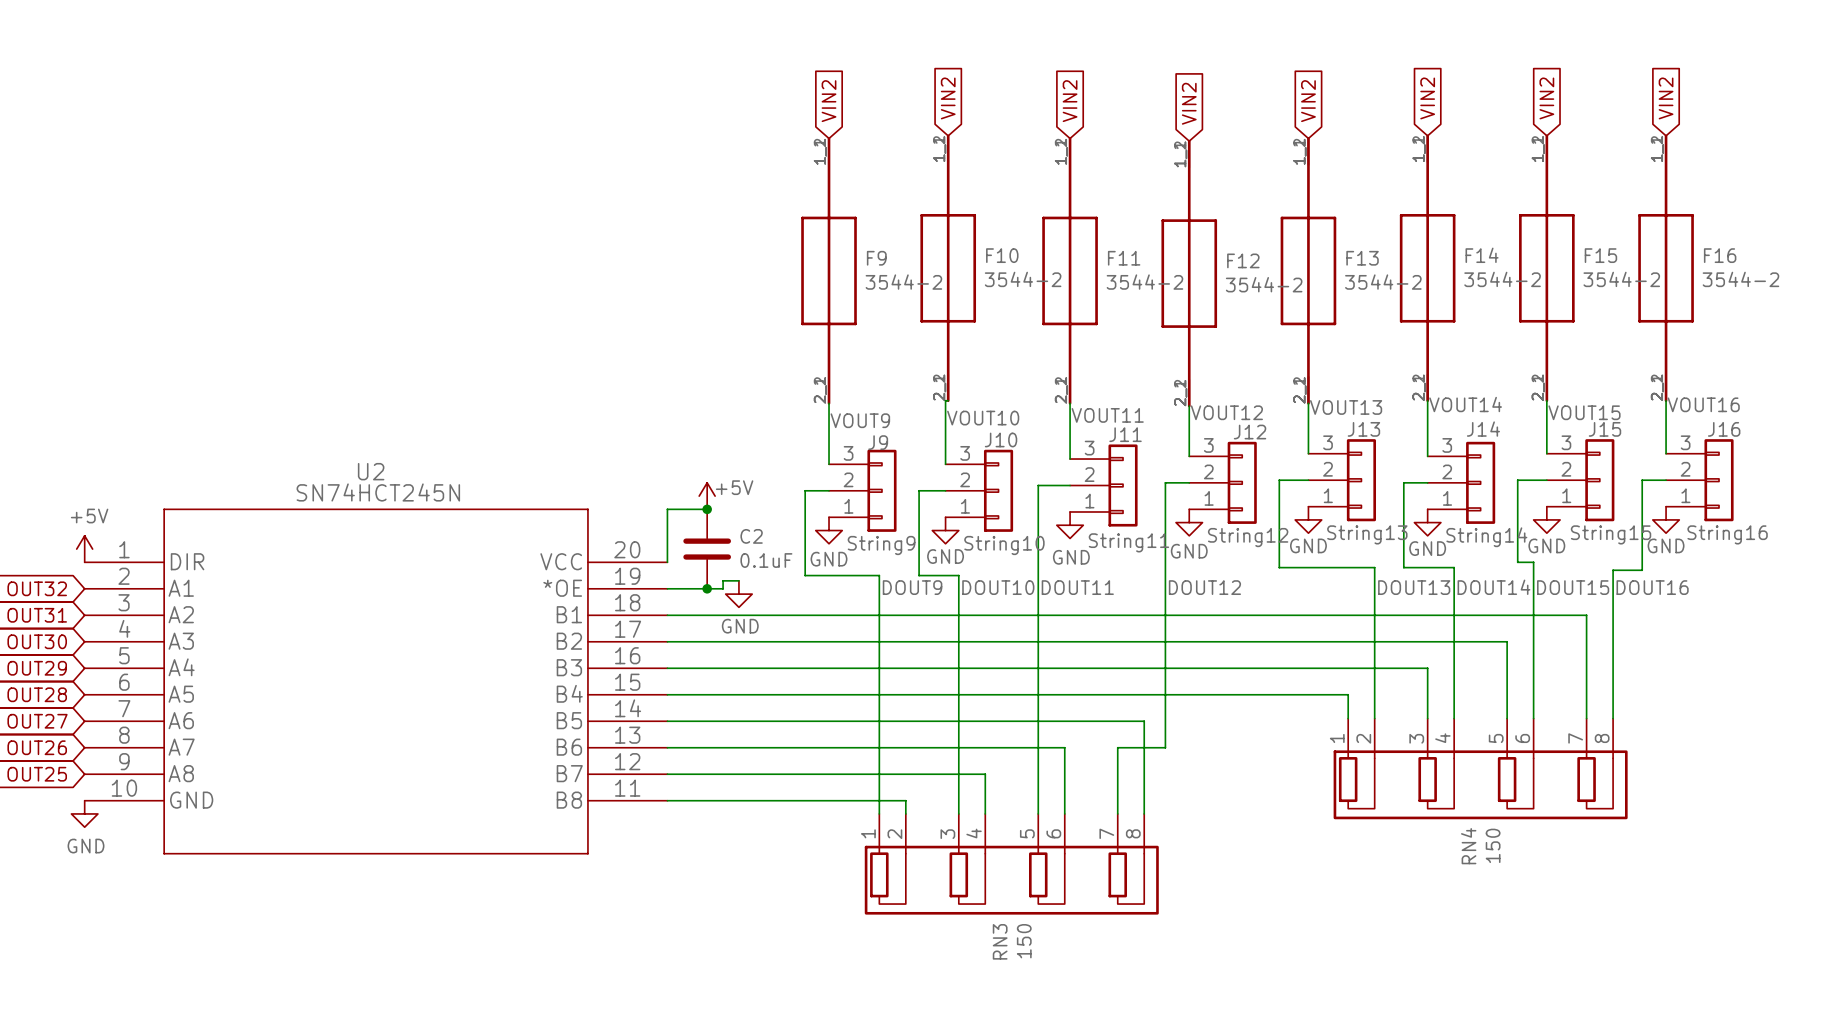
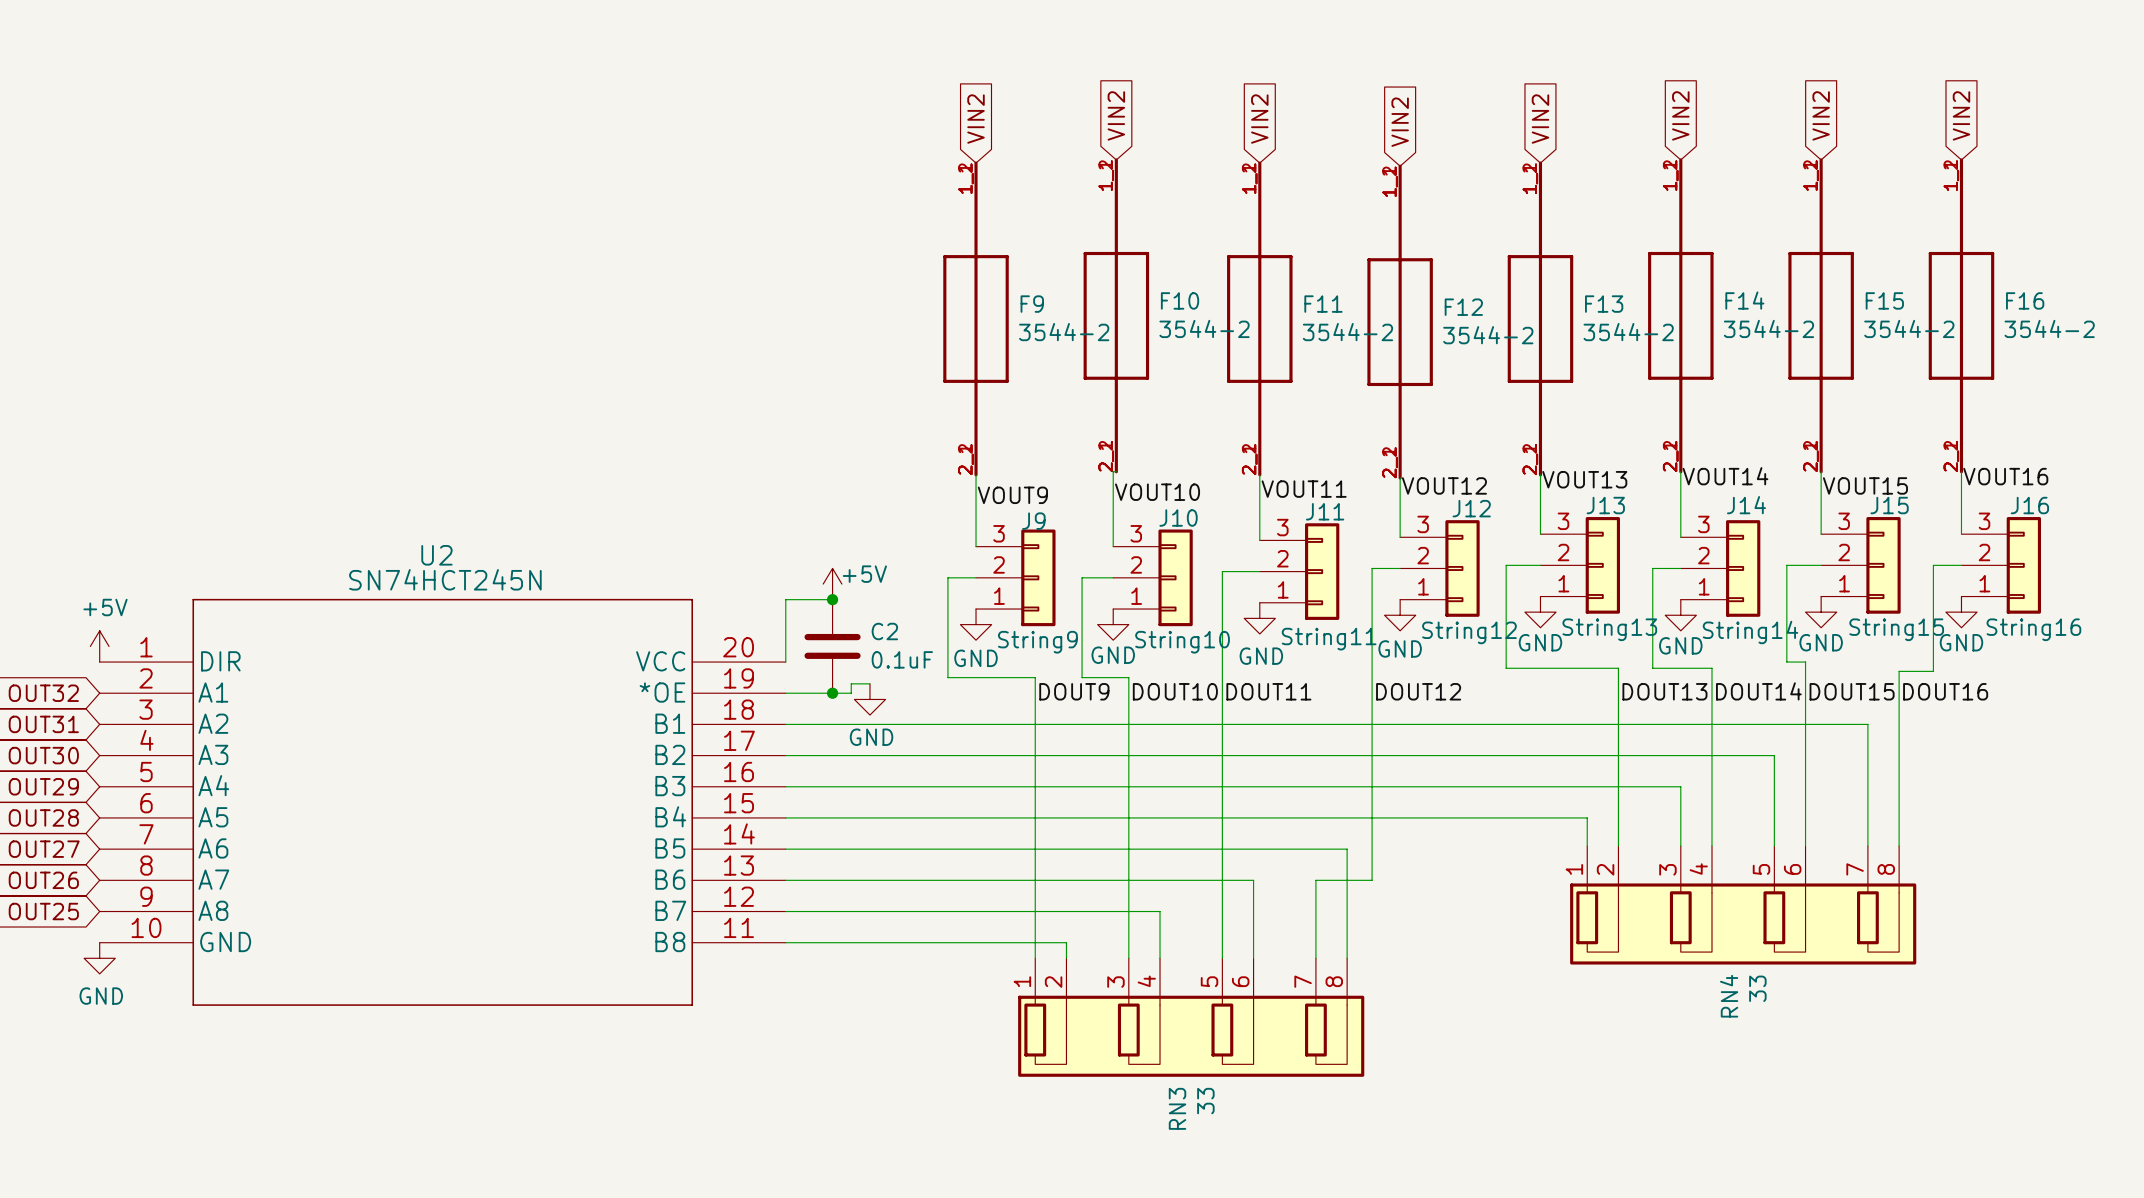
RN4 value: 150 (1493, 845) -> 33 (1757, 988)
RN3 value: 150 (1024, 941) -> 33 (1205, 1101)

